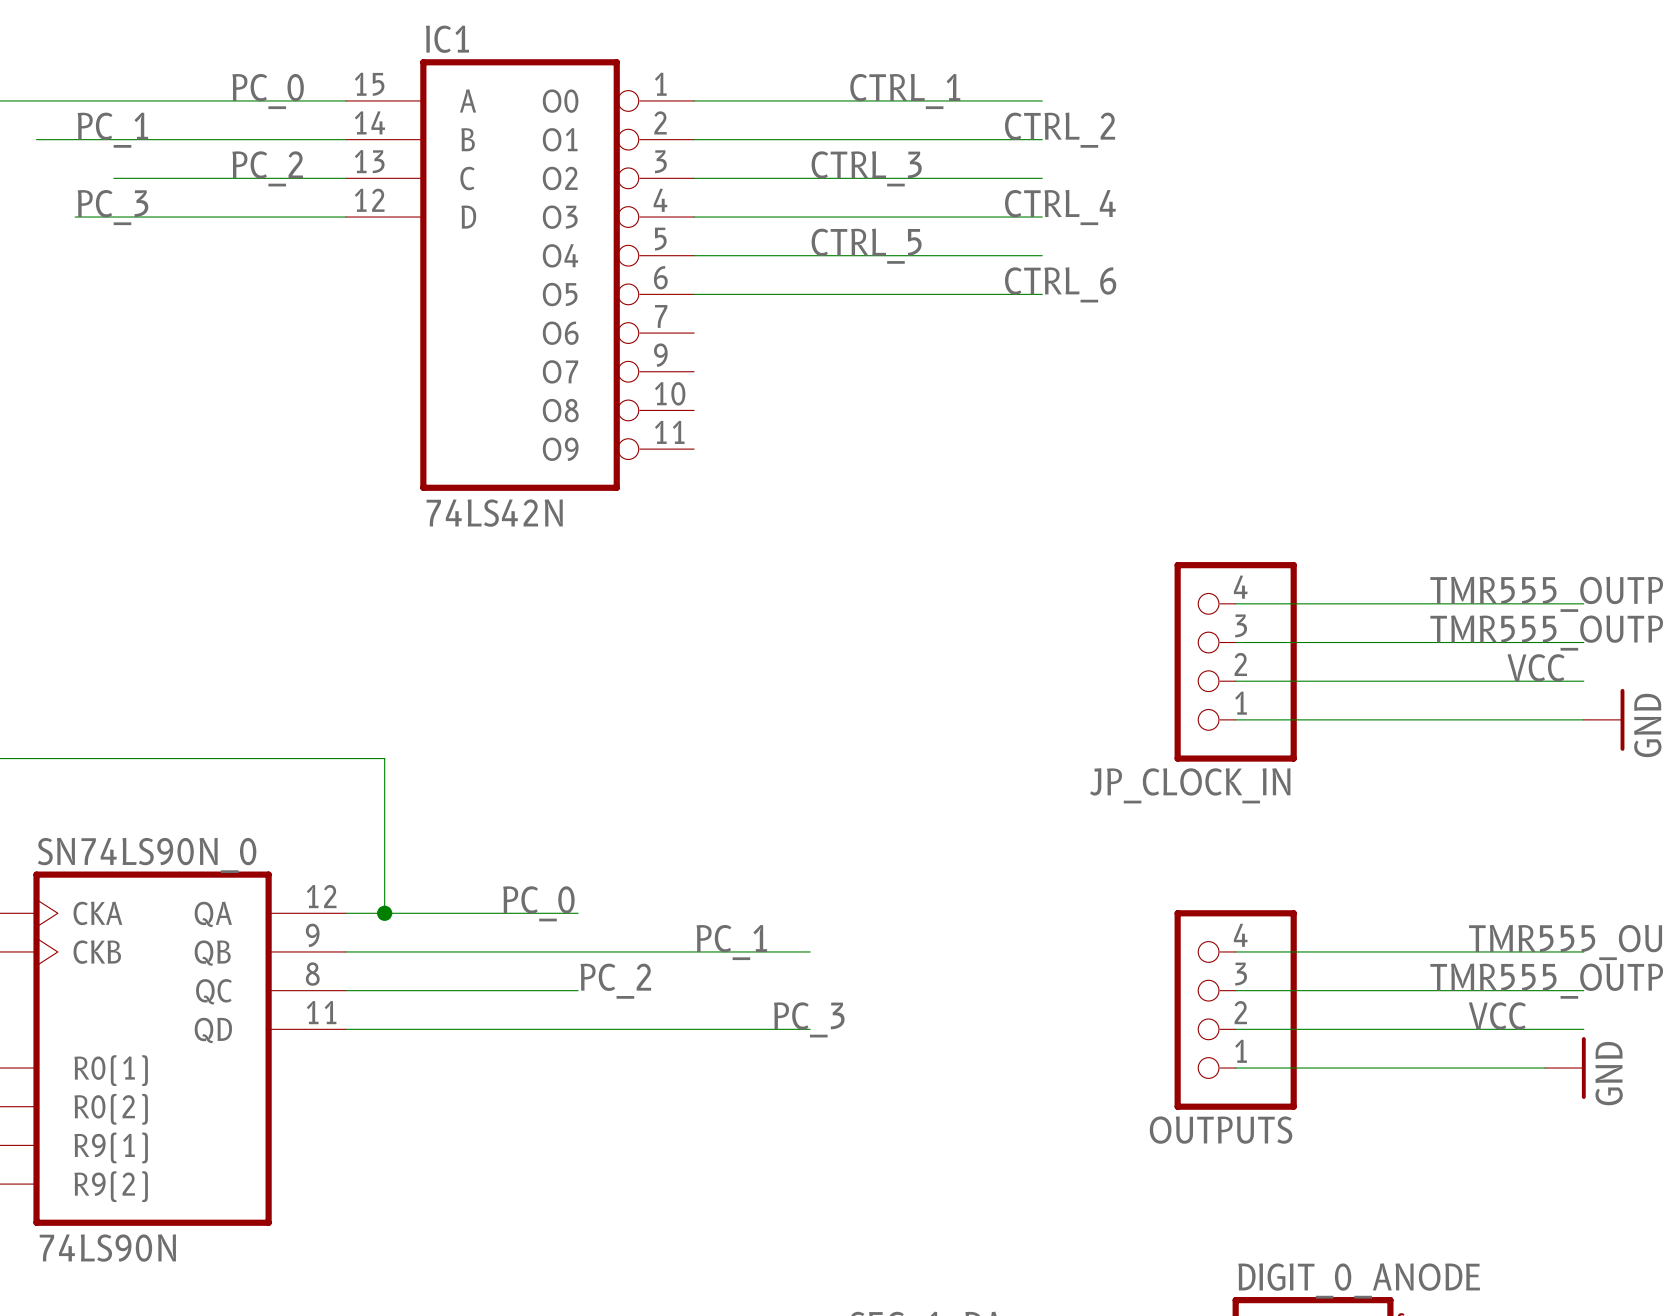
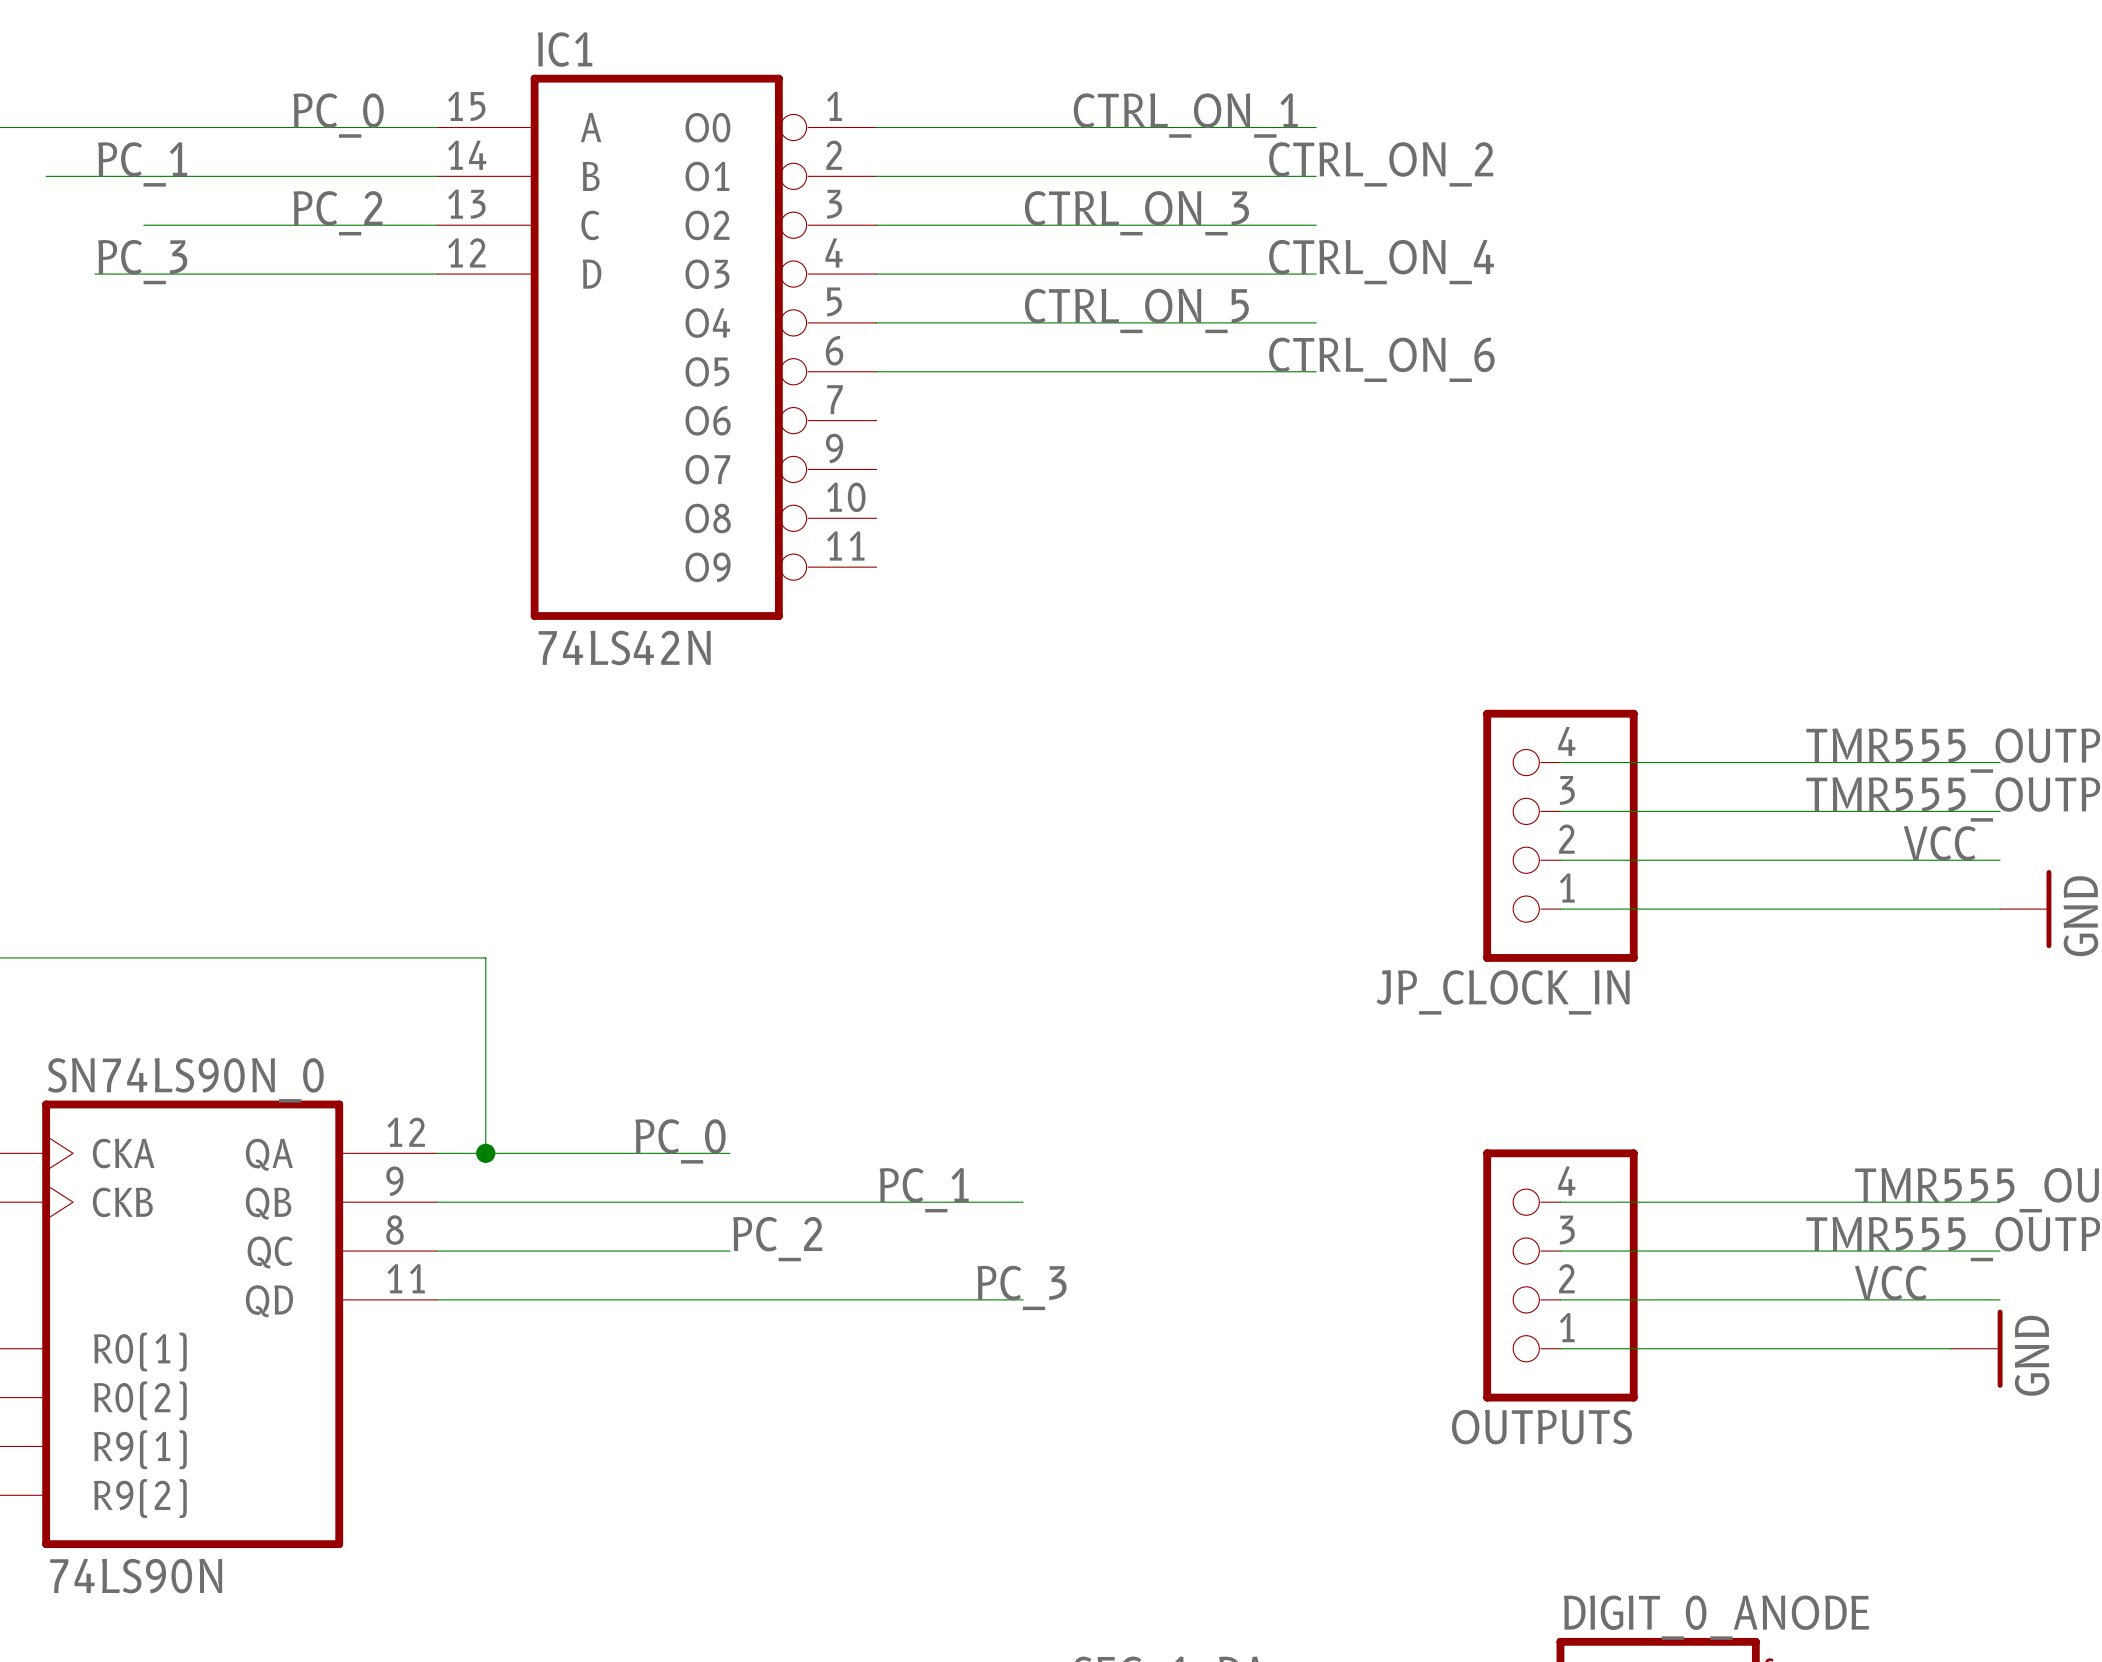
label: CTRL_1 (905, 91) -> CTRL_ON_1 (1185, 115)
label: CTRL_2 (1060, 130) -> CTRL_ON_2 (1381, 164)
label: CTRL_3 (866, 168) -> CTRL_ON_3 (1136, 213)
label: CTRL_4 (1060, 207) -> CTRL_ON_4 (1381, 262)
label: CTRL_5 (866, 246) -> CTRL_ON_5 (1136, 310)
label: CTRL_6 (1060, 284) -> CTRL_ON_6 (1381, 359)

